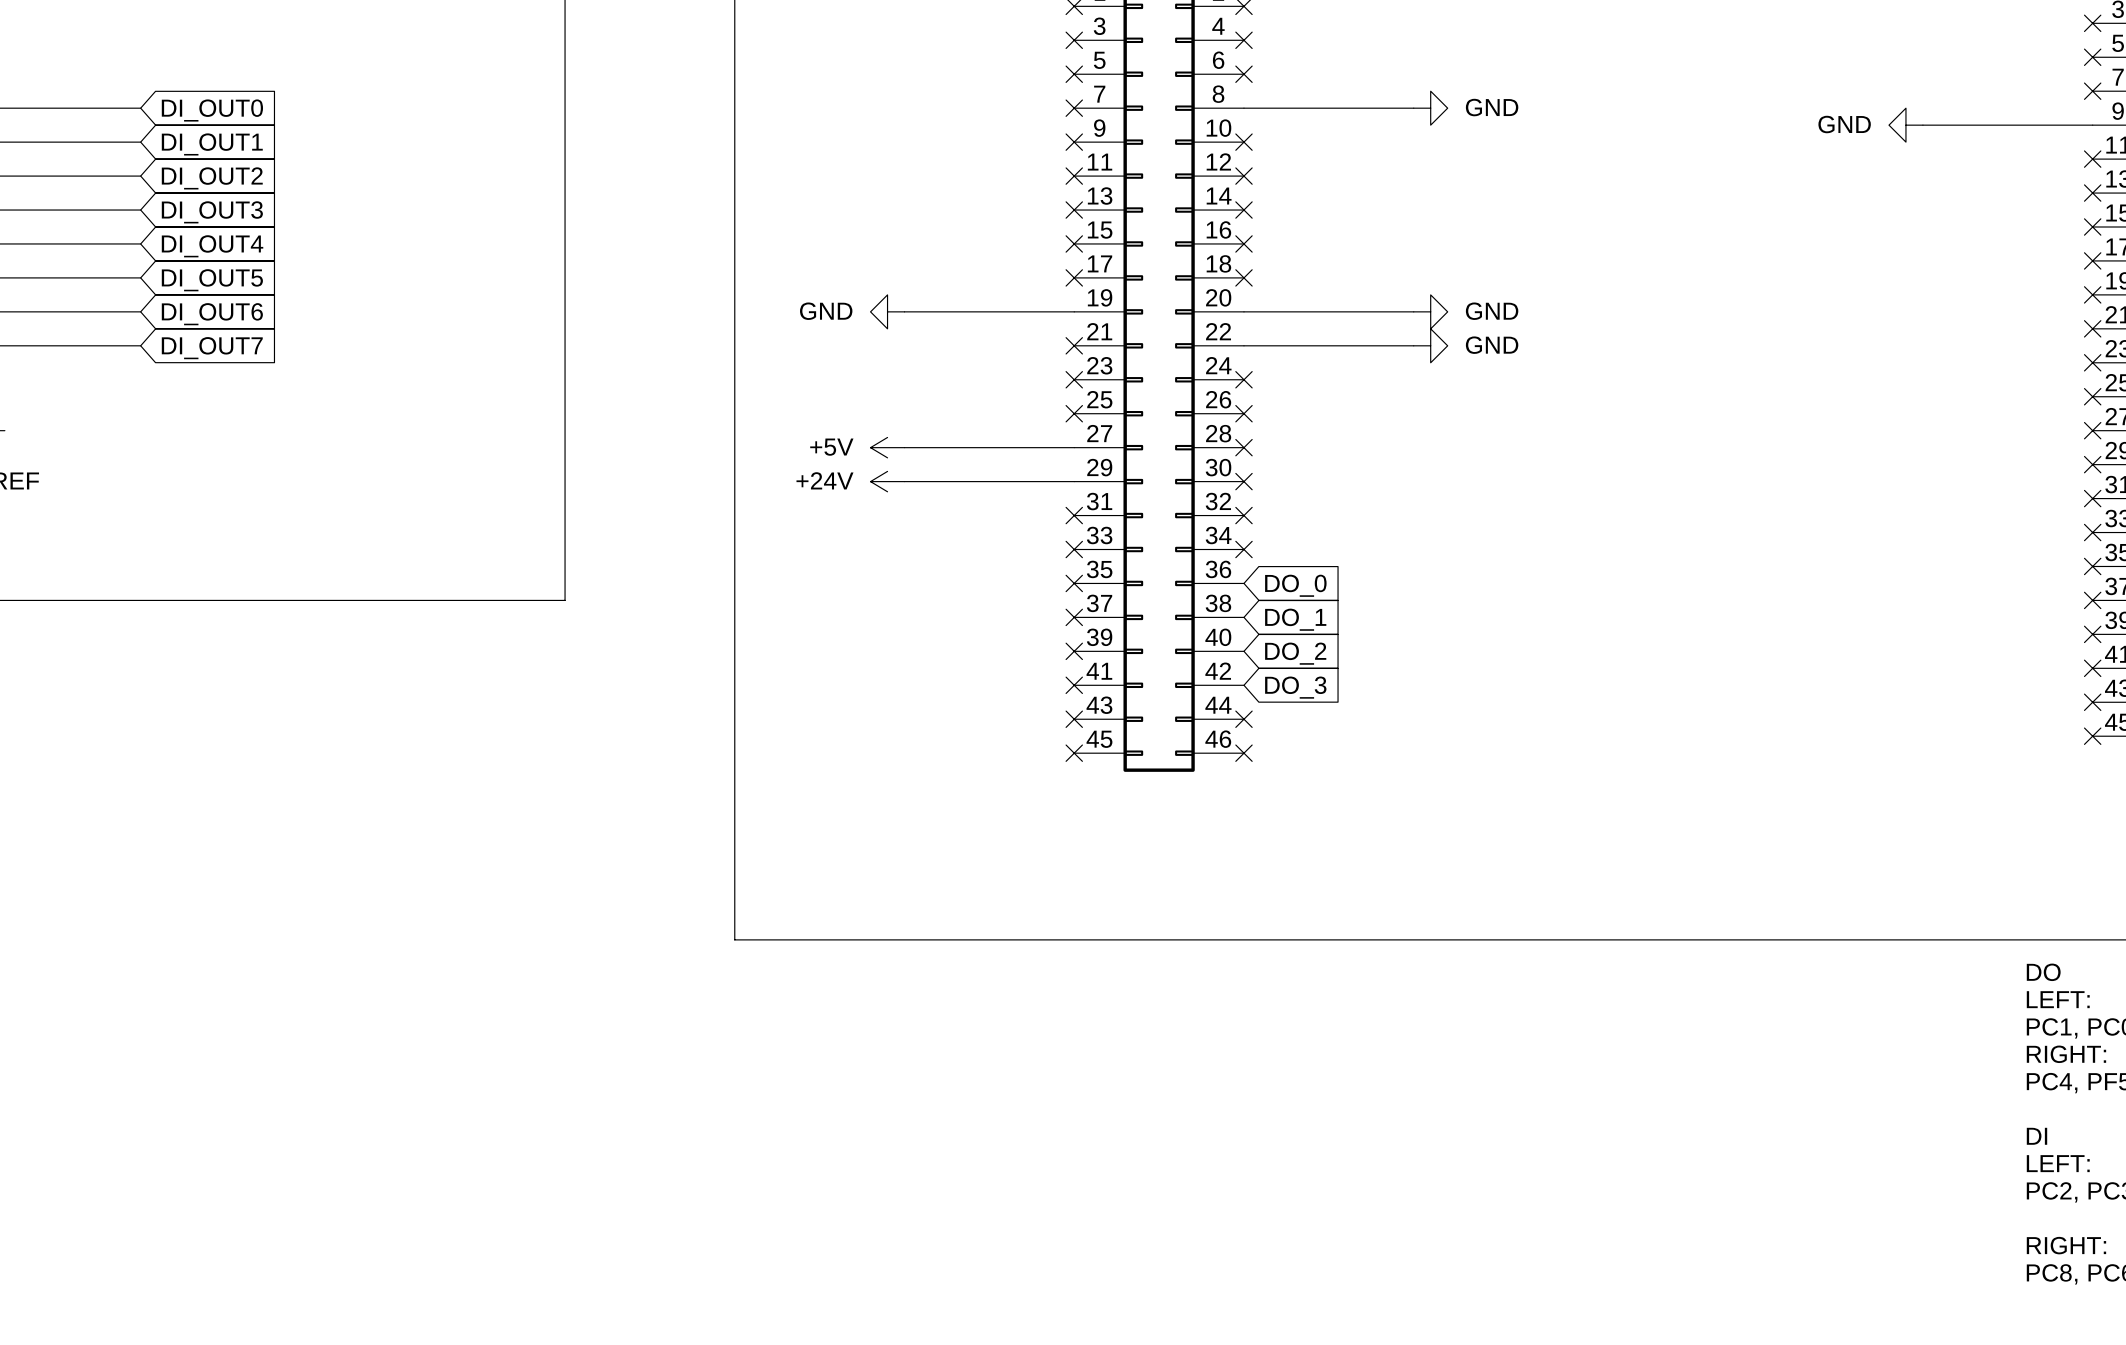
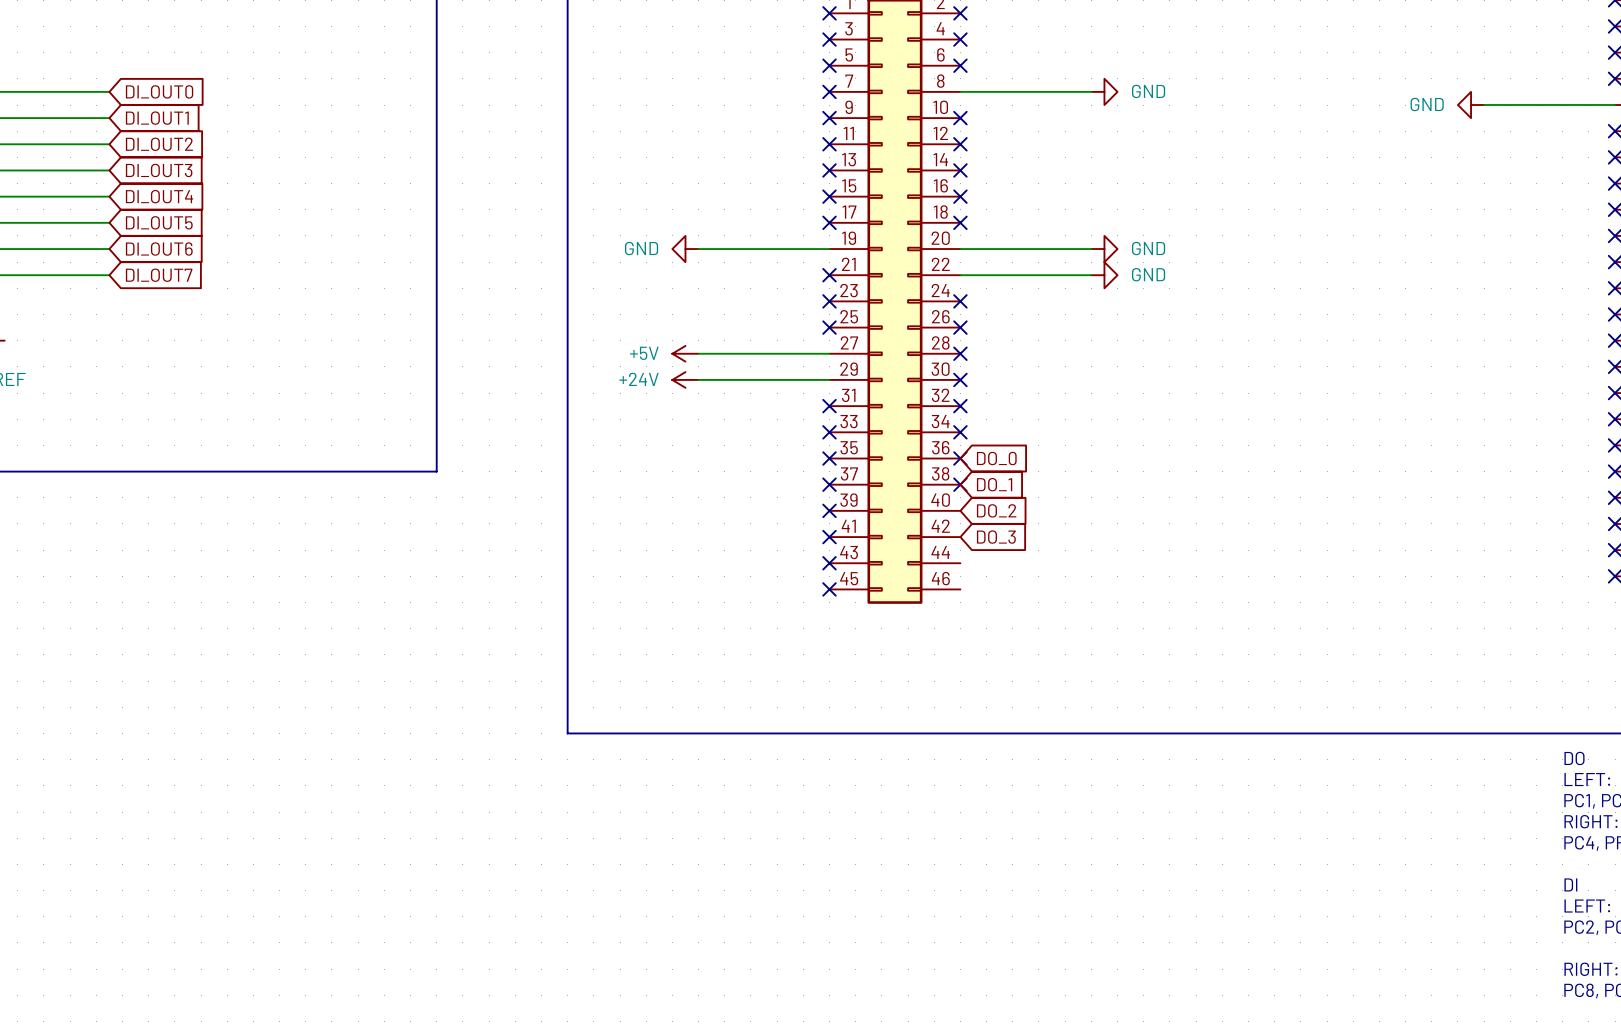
no-connect mark: none -> (960, 458)
no-connect mark: none -> (960, 484)
no-connect mark: (1243, 719) -> none
no-connect mark: (1243, 753) -> none

